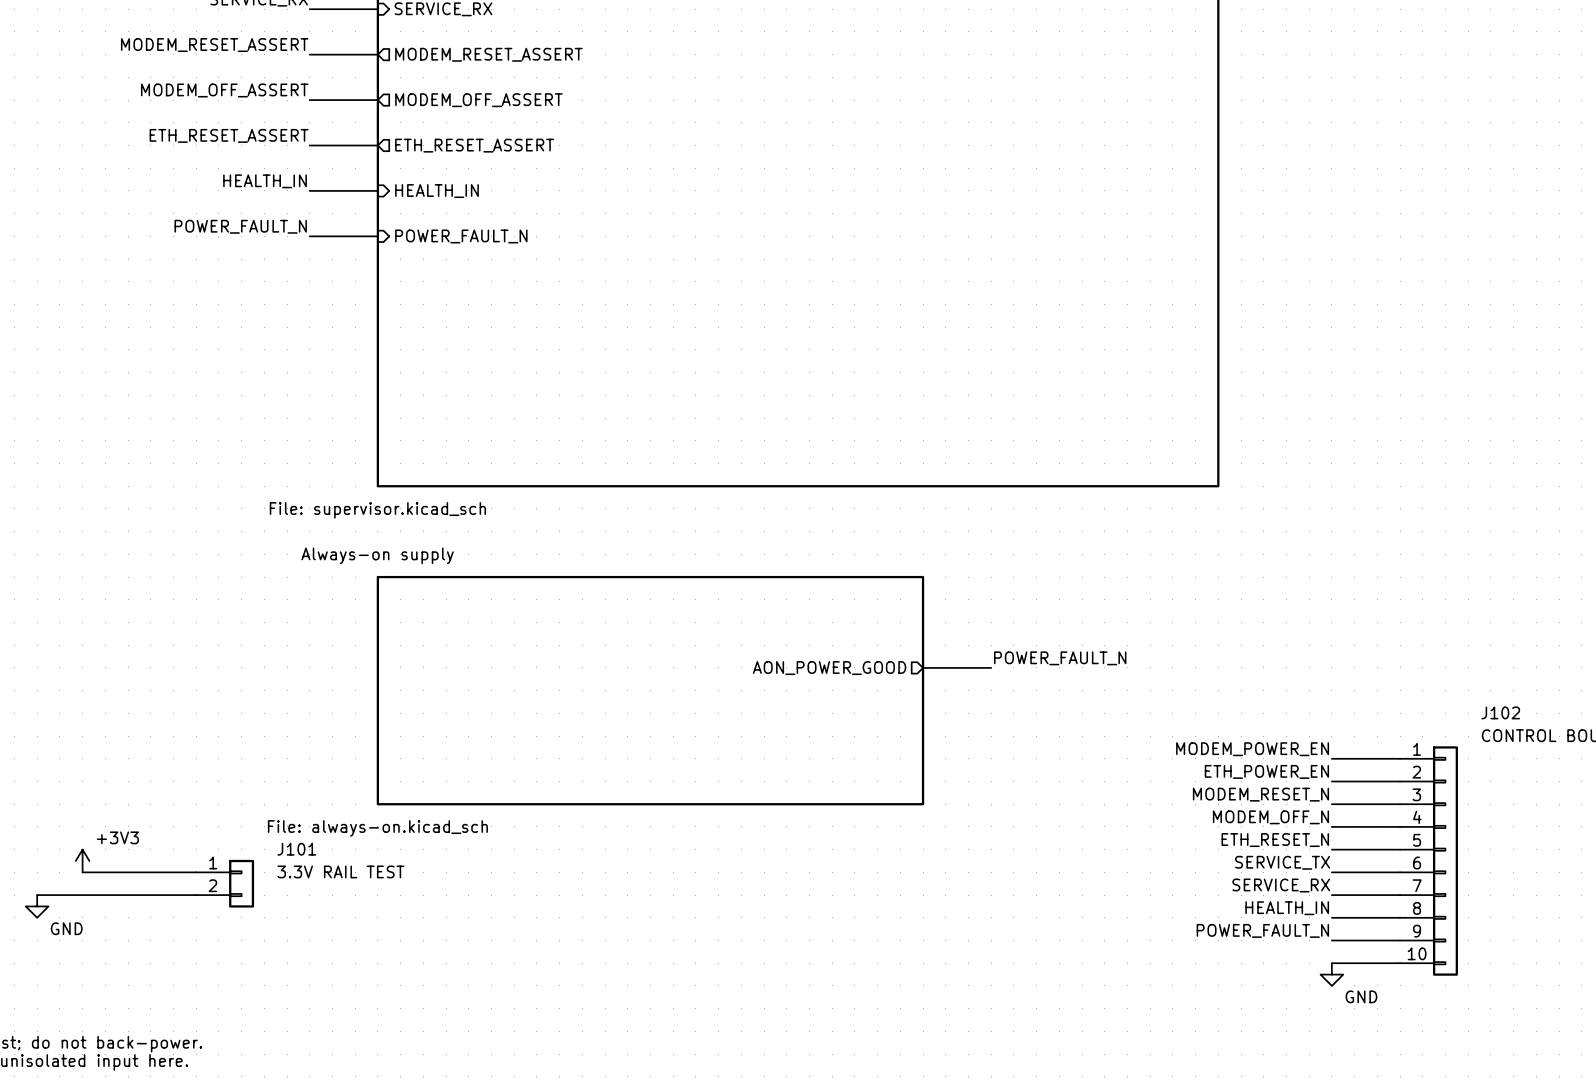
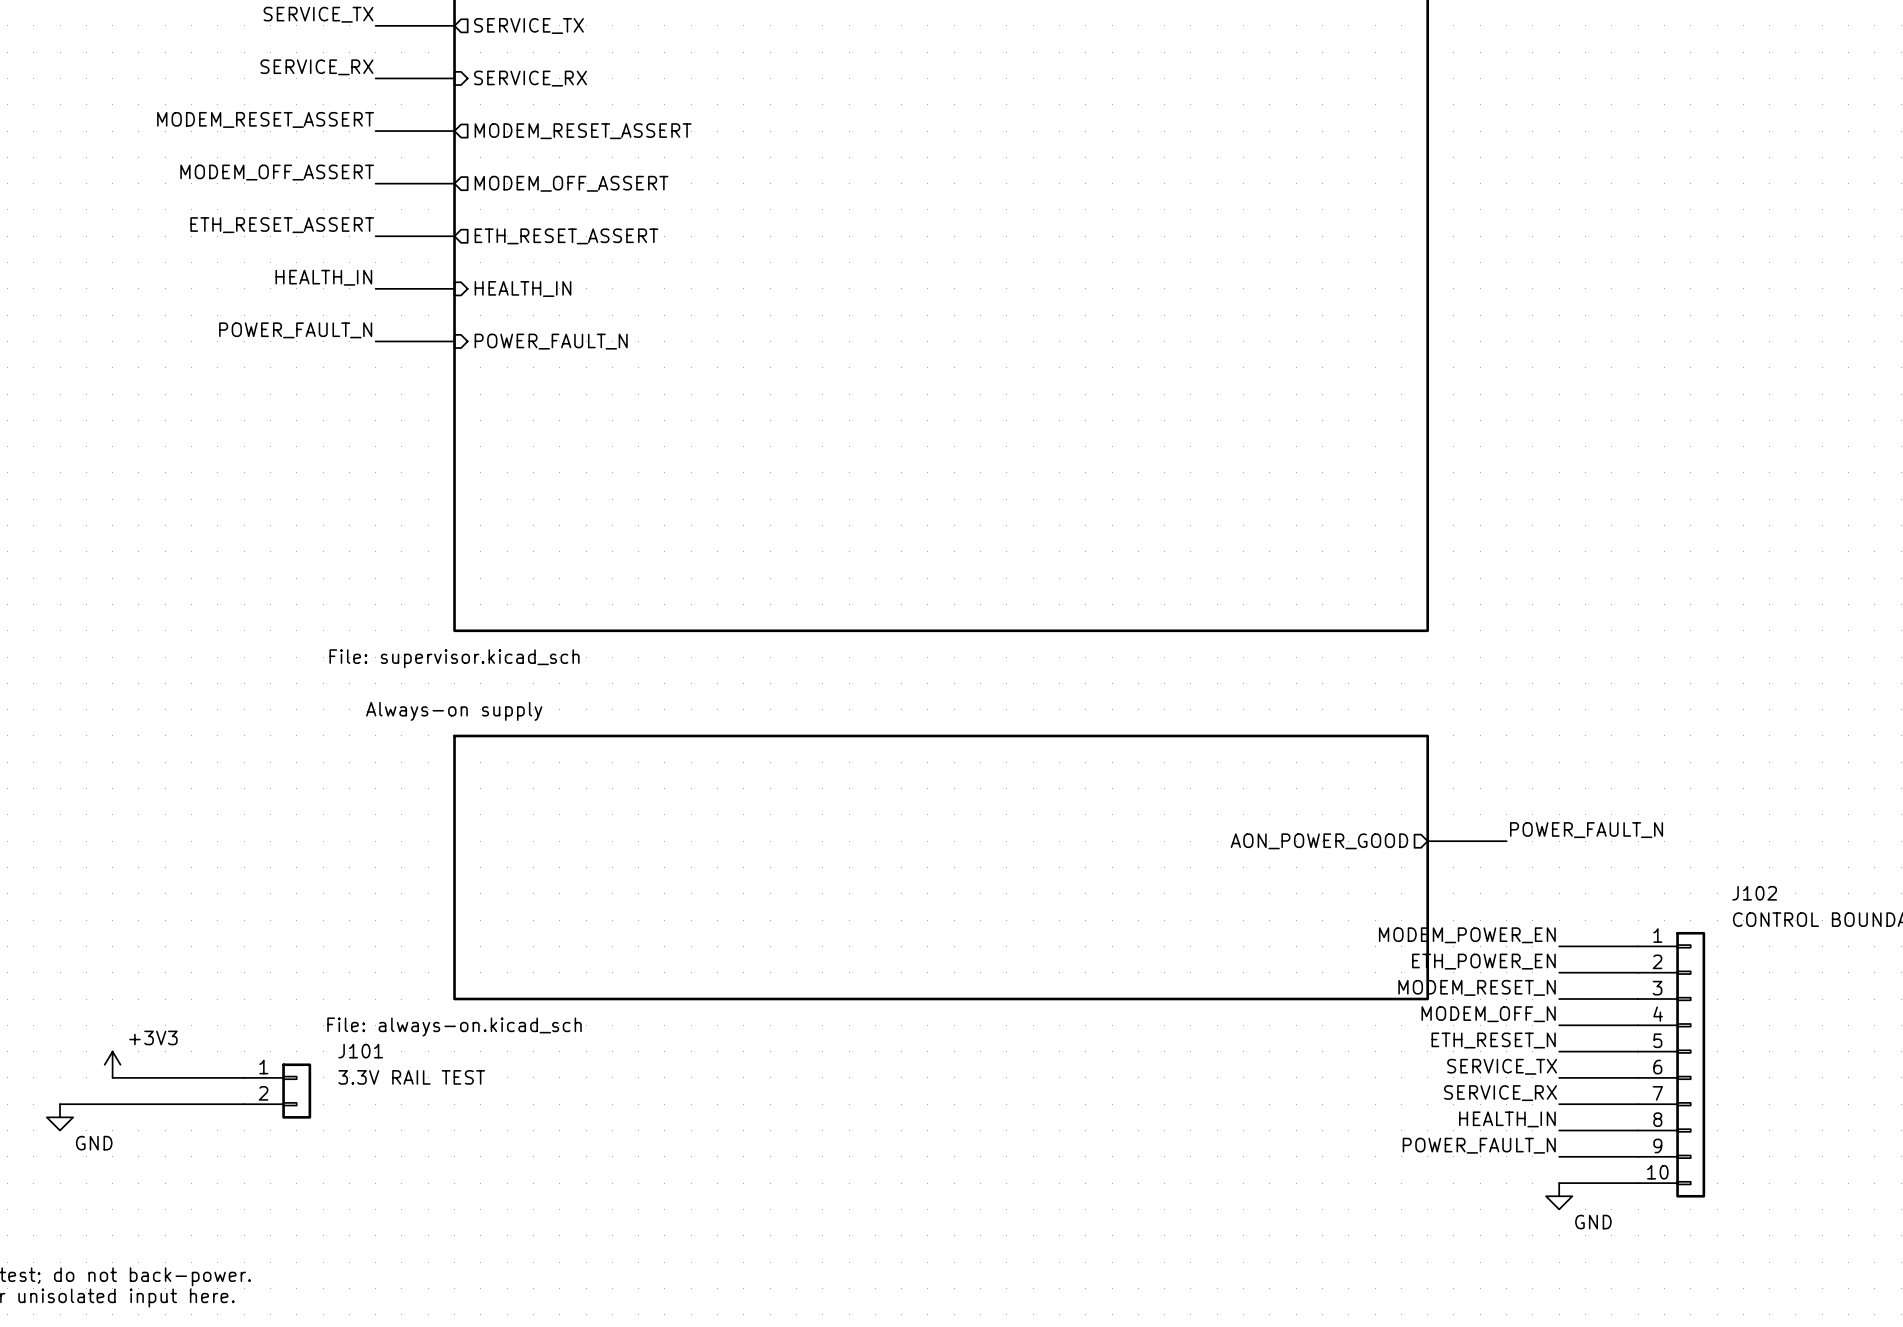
label: POWER_FAULT_N (1060, 658) -> none
label: none -> POWER_FAULT_N (1586, 830)
wire: (923, 667) (991, 667) -> none
wire: none -> (1427, 841) (1506, 841)
sheet pin: AON_POWER_GOOD (829, 668) -> none
sheet pin: none -> AON_POWER_GOOD (1319, 841)
sheet Always-on supply: File: always-on.kicad_sch (650, 690) -> none
sheet Always-on supply: none -> File: always-on.kicad_sch (941, 867)

